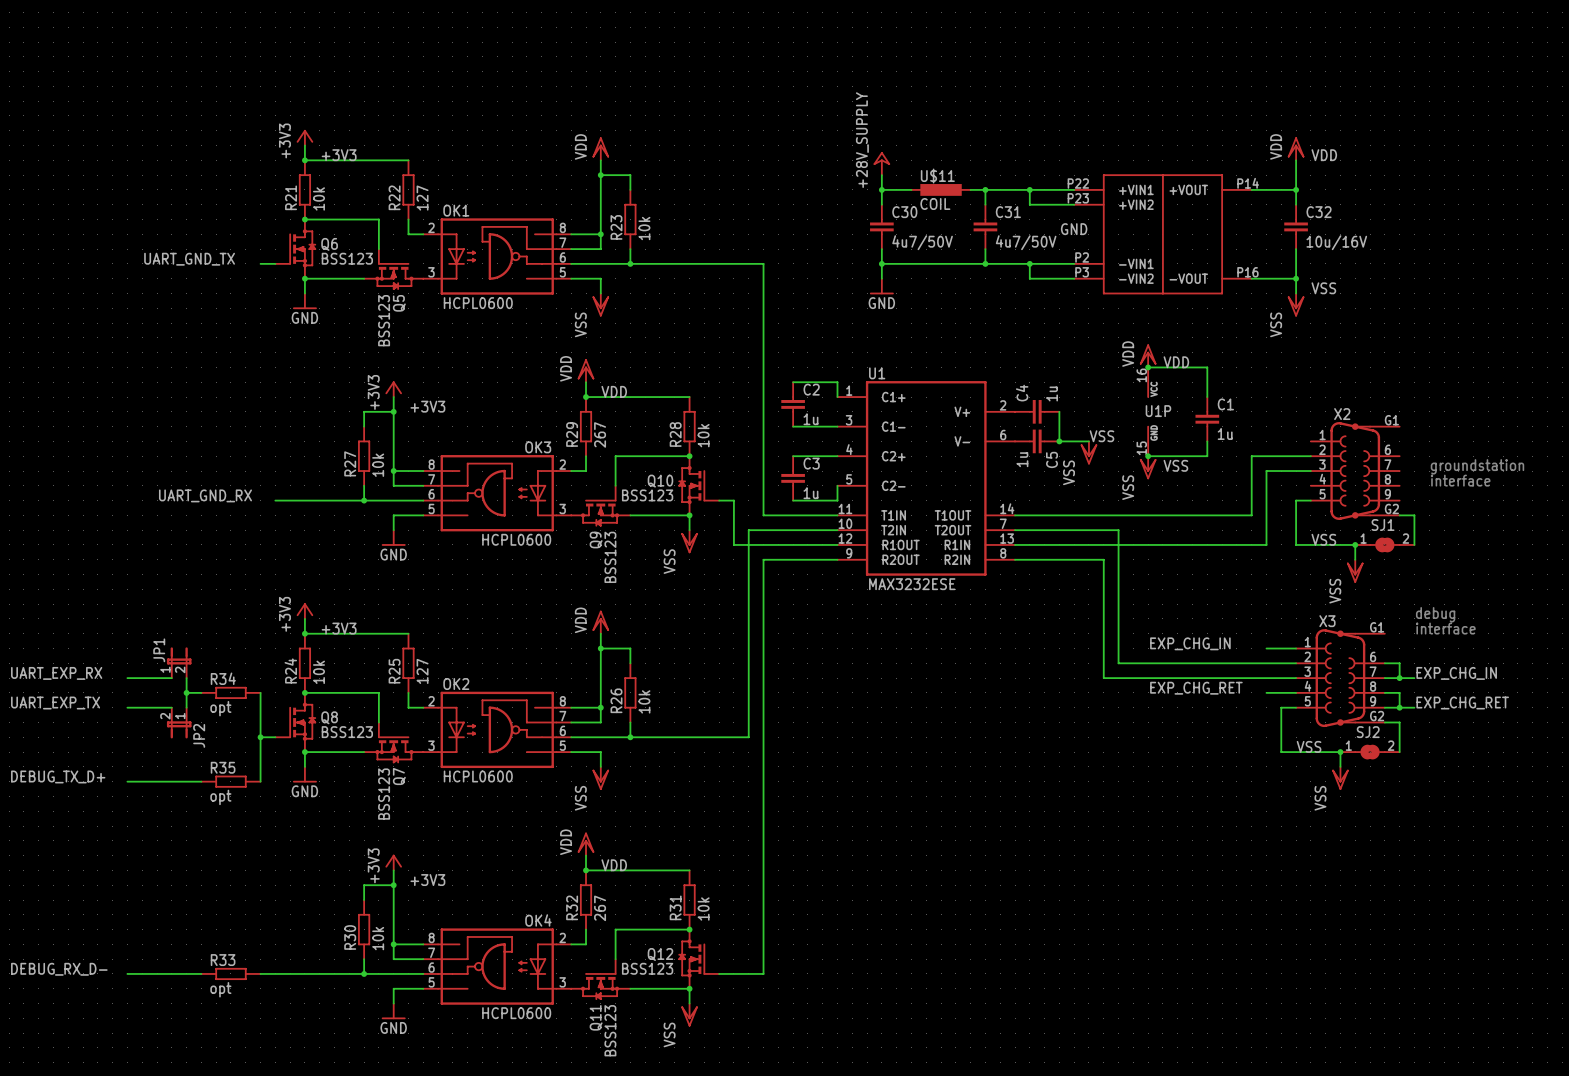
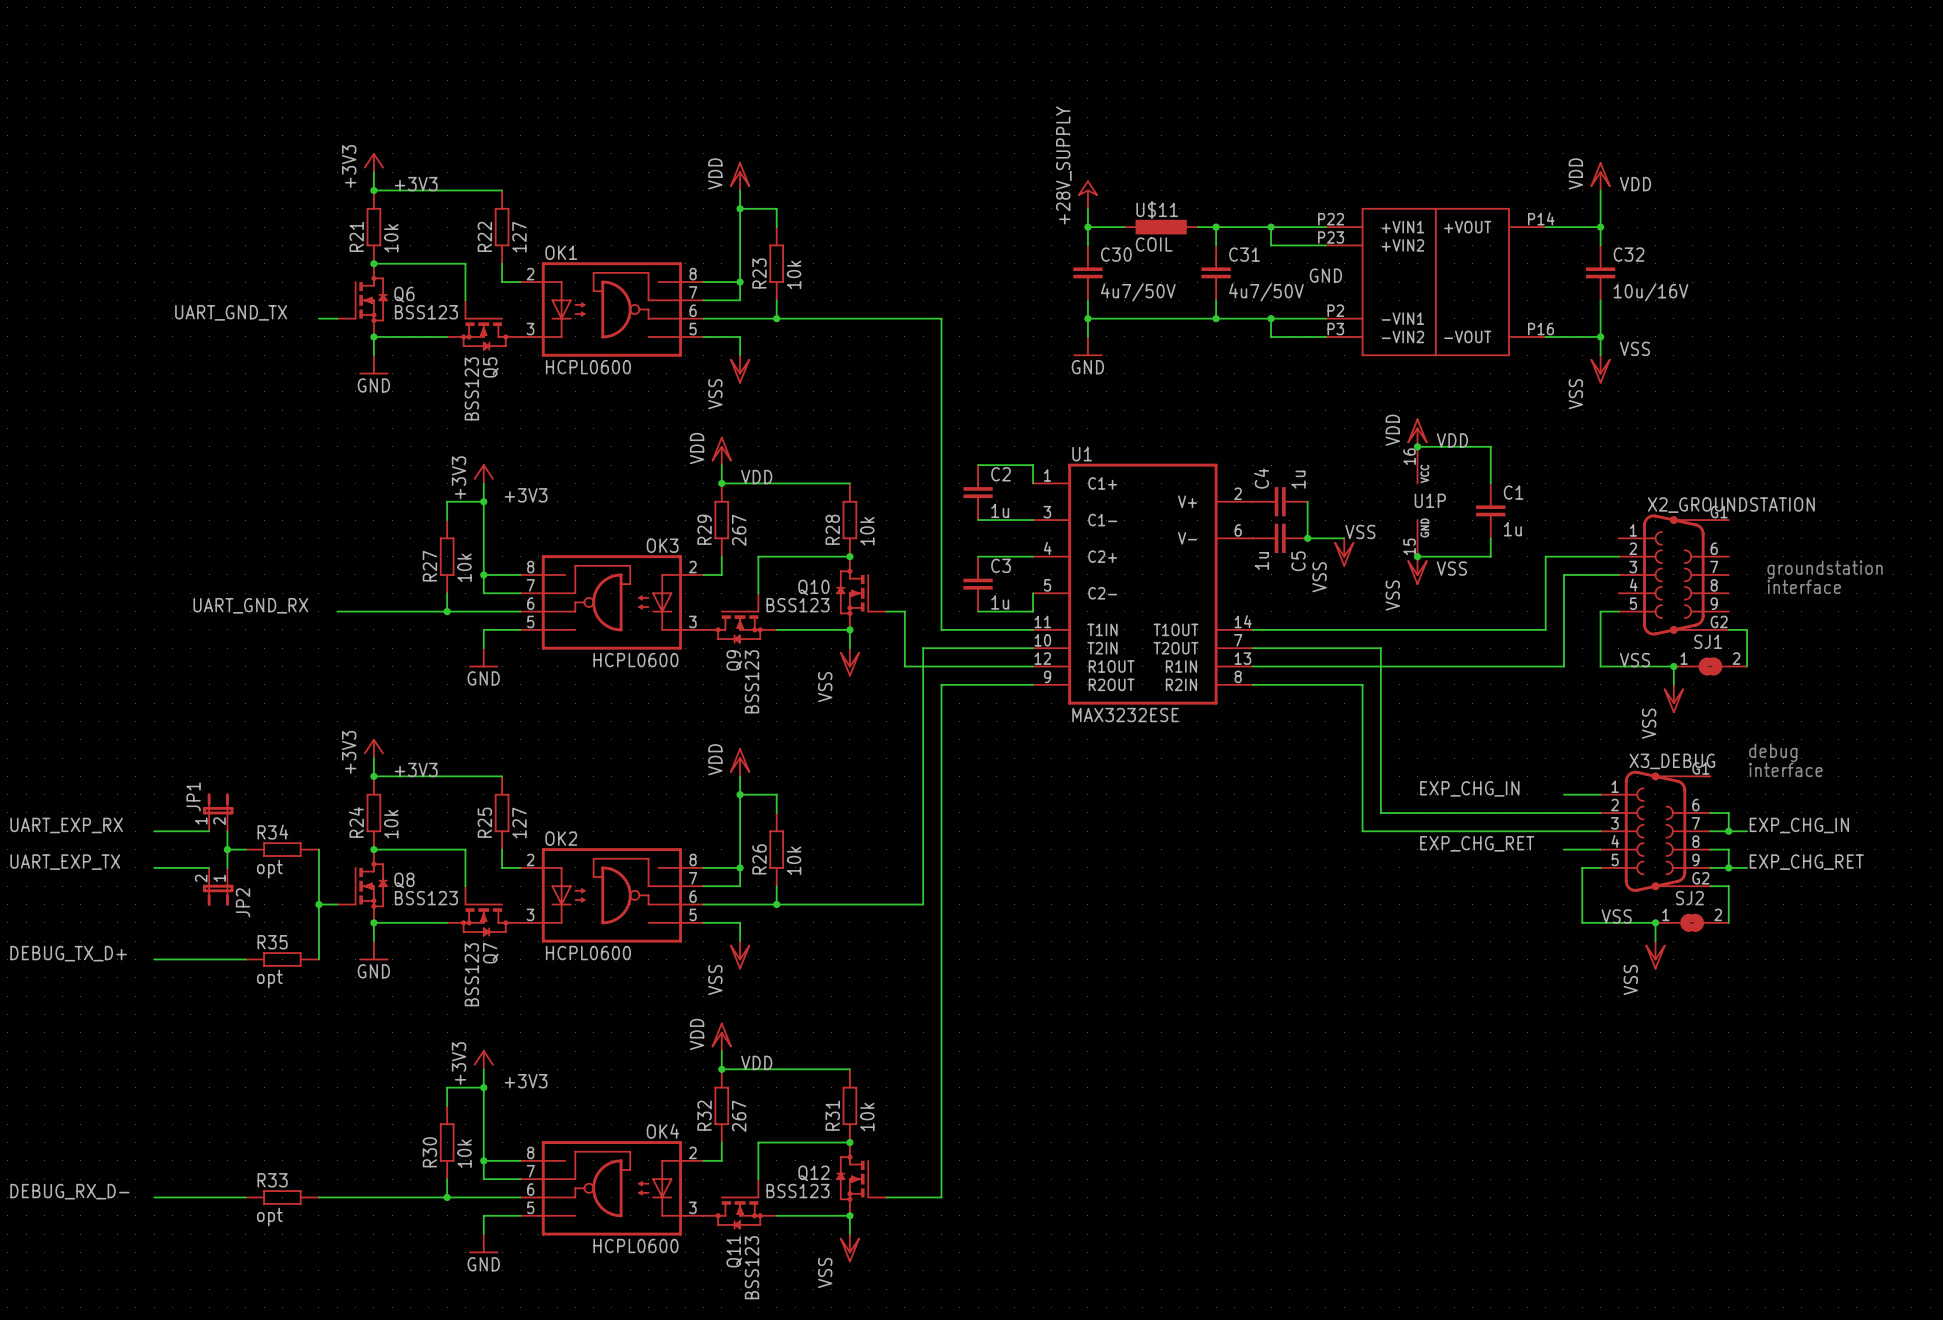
X2 name: X2 (1342, 414) -> X2_GROUNDSTATION (1731, 505)
X3 name: X3 (1327, 621) -> X3_DEBUG (1672, 761)

